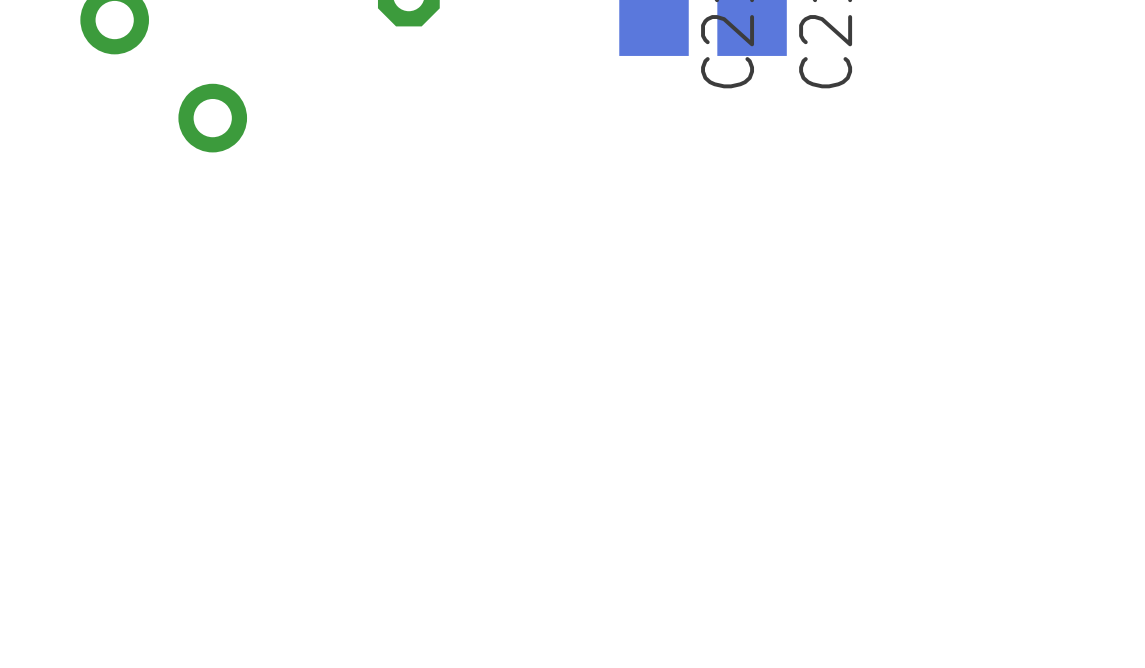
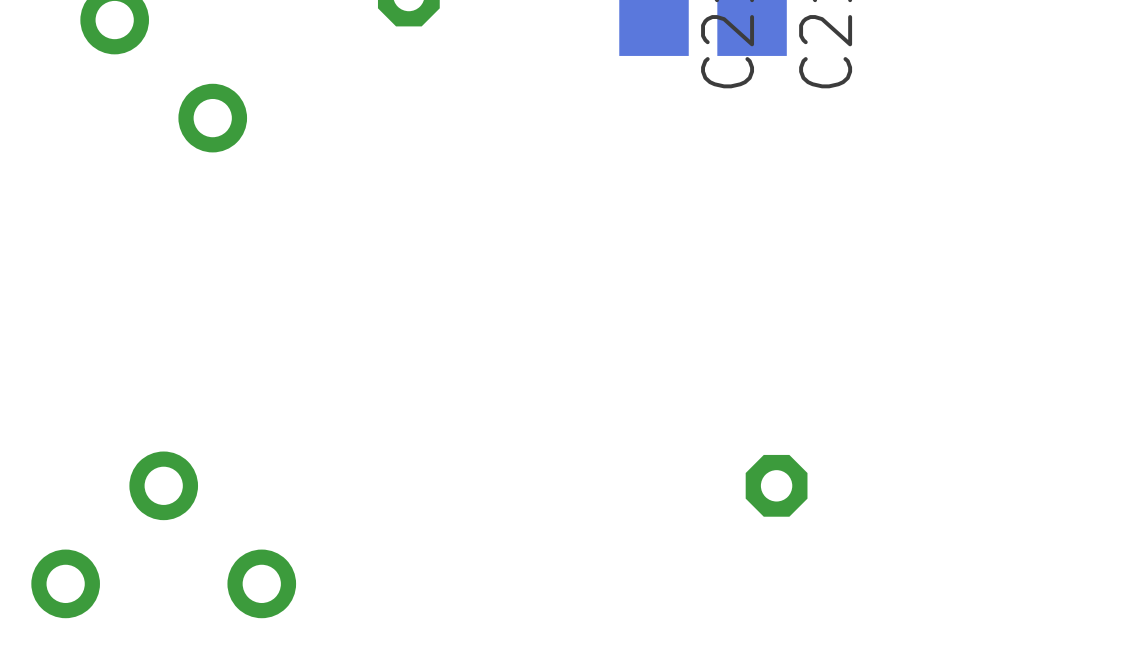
part: none -> (776, 485)
part: none -> (163, 534)

